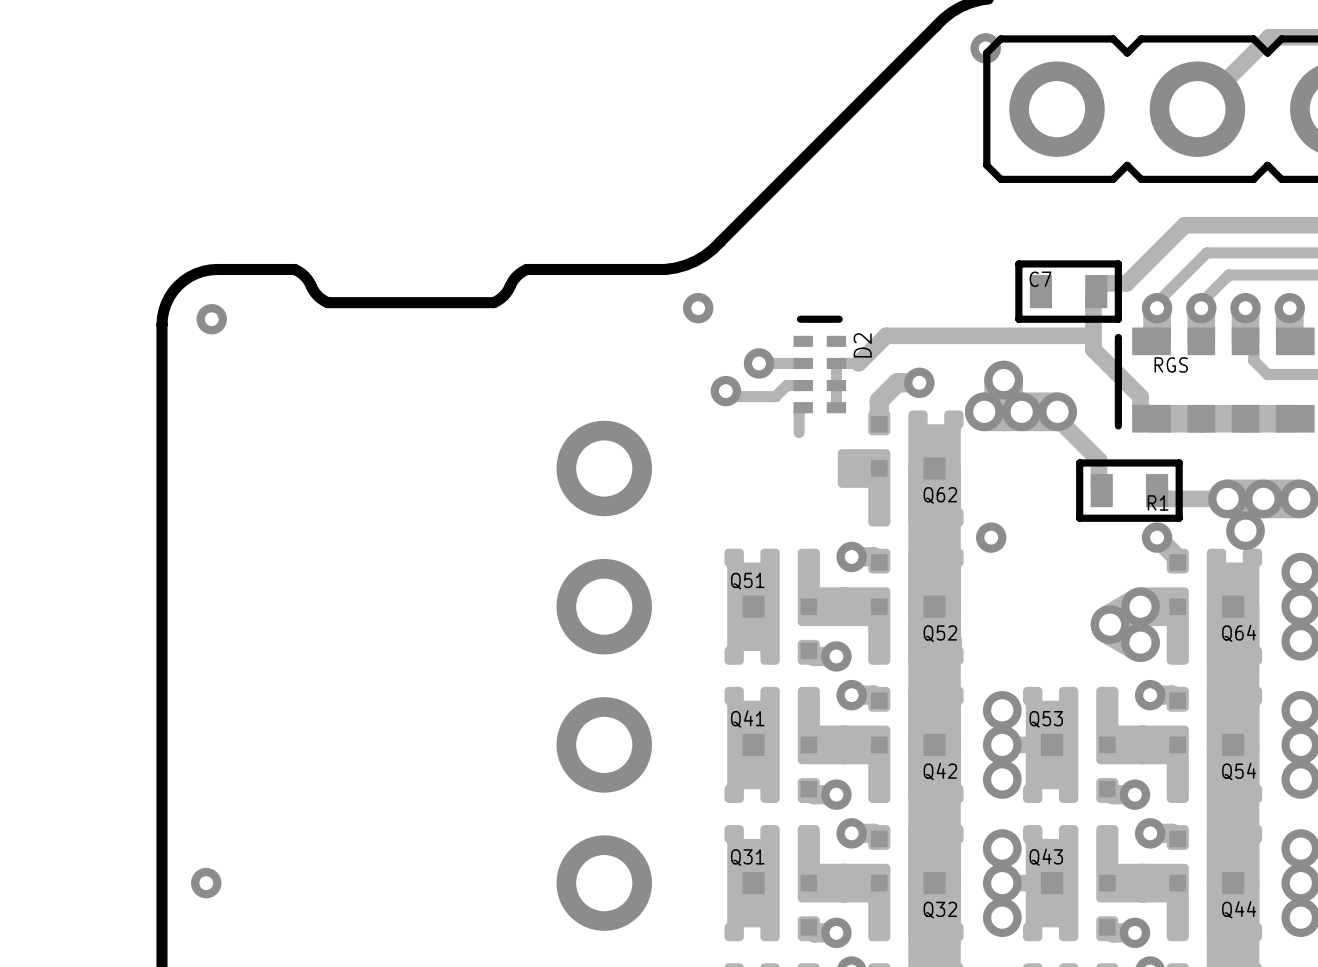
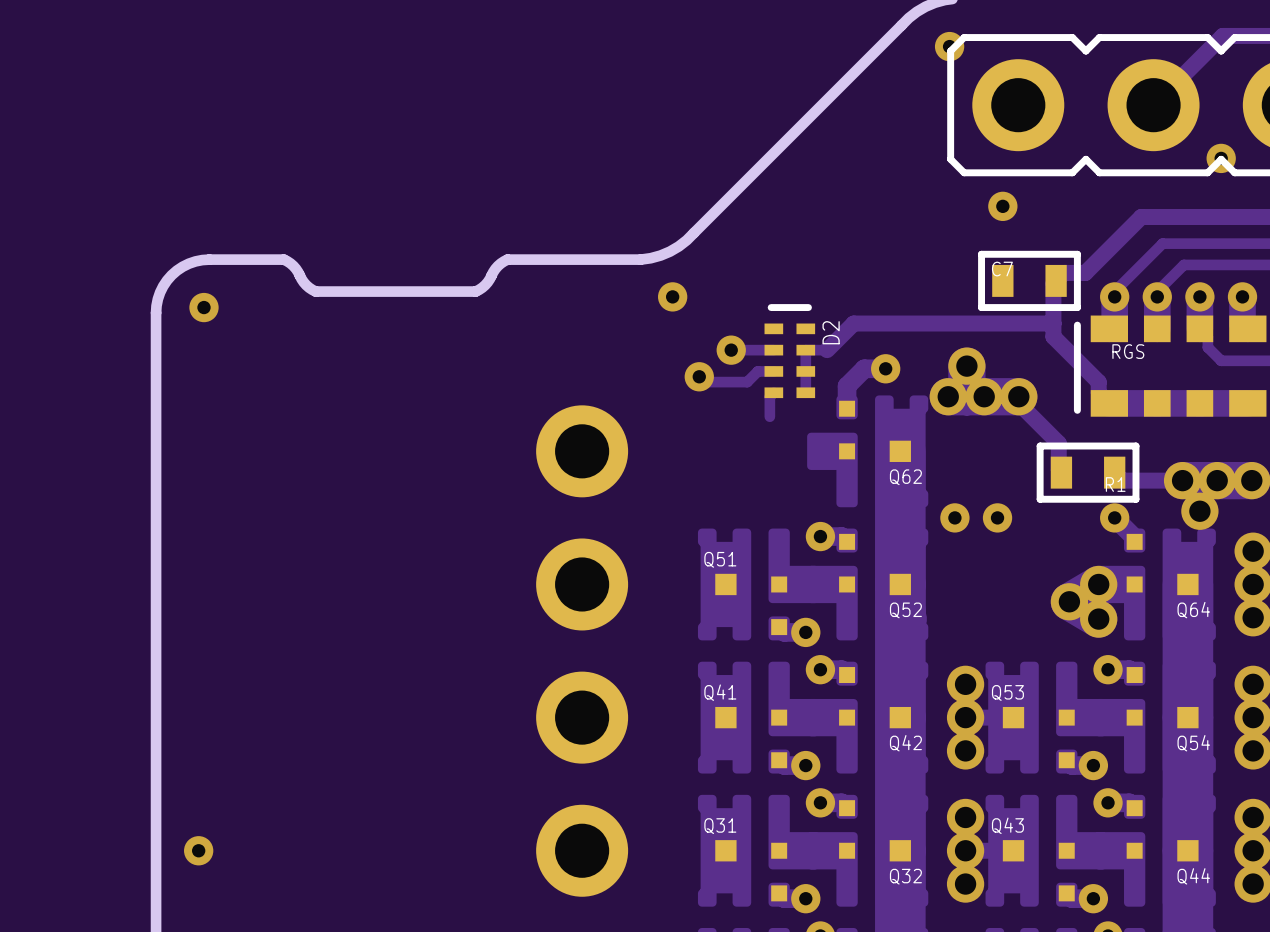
via: none -> (1221, 158)
via: none -> (1002, 206)
via: none -> (997, 517)

